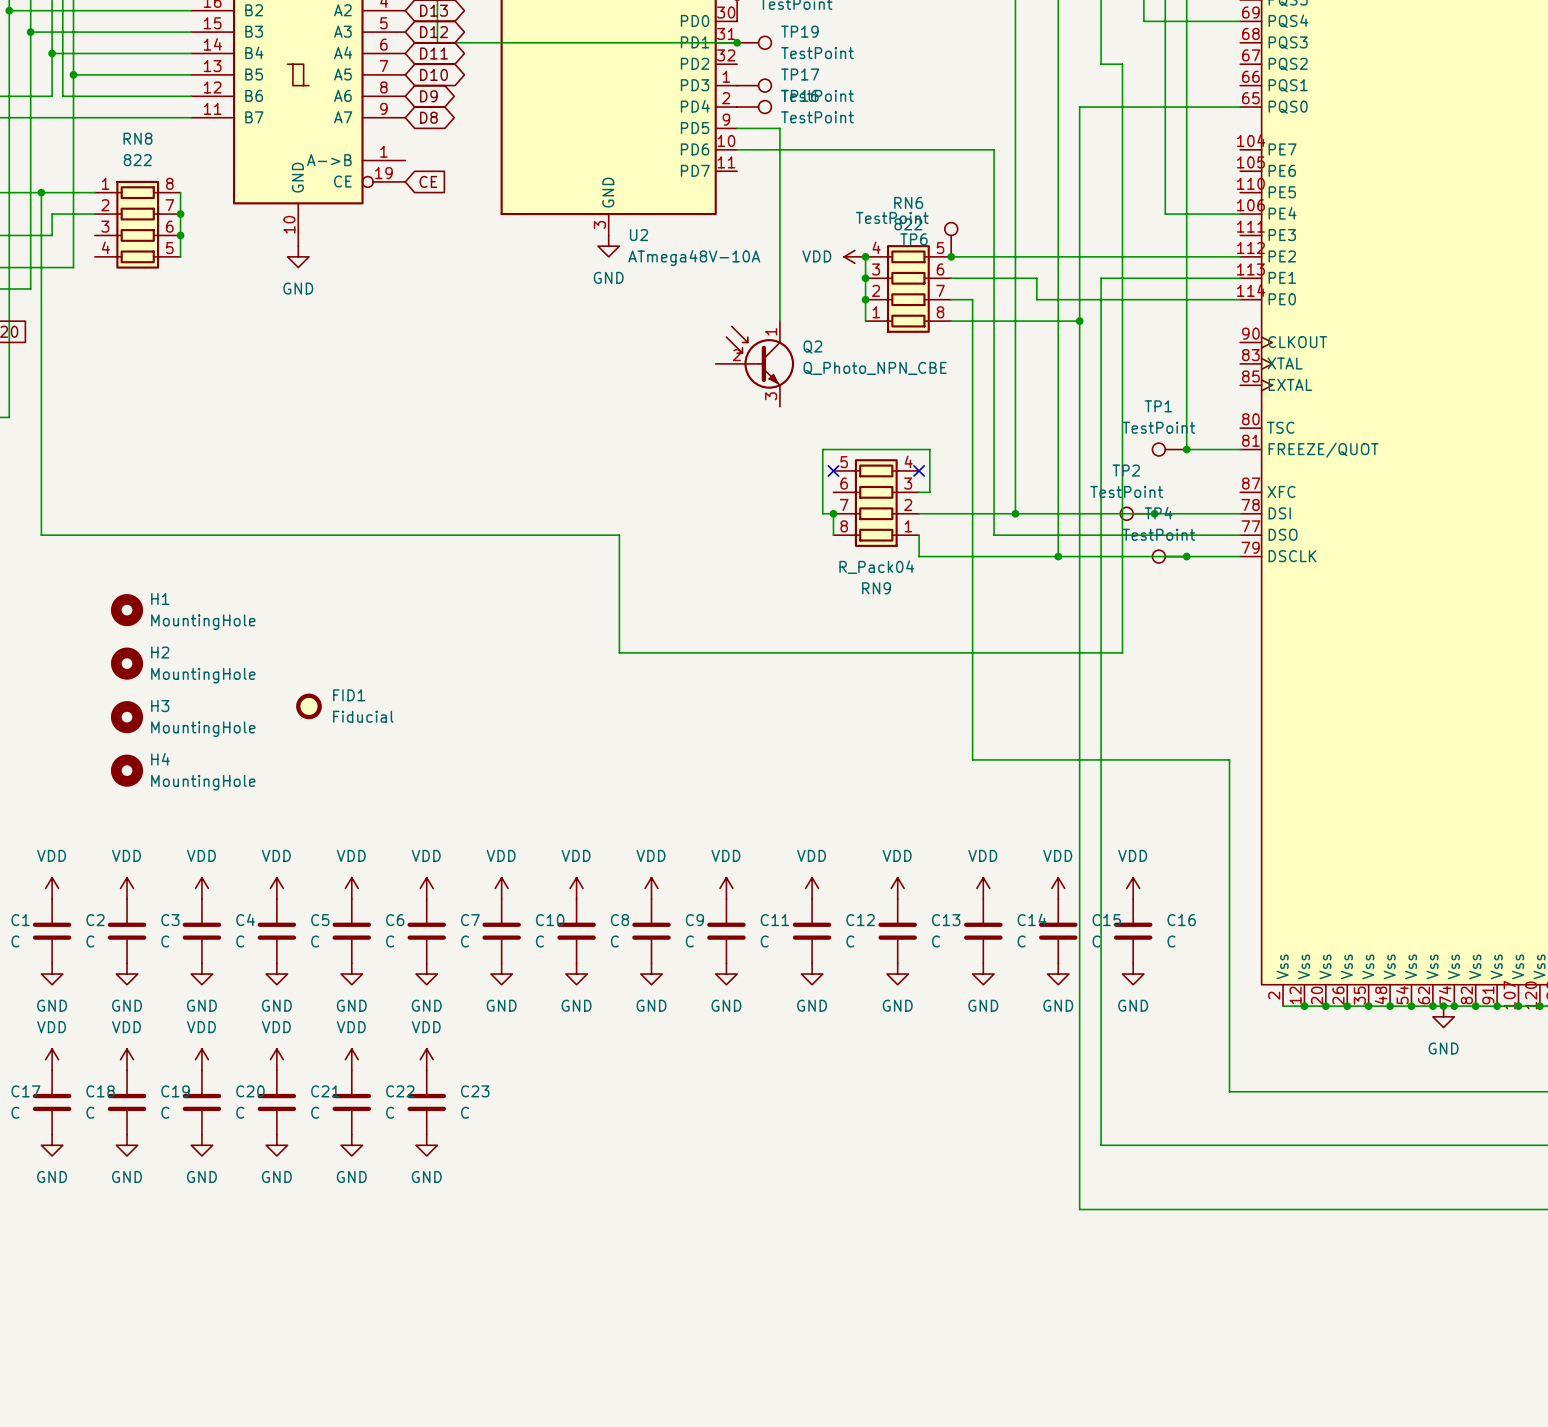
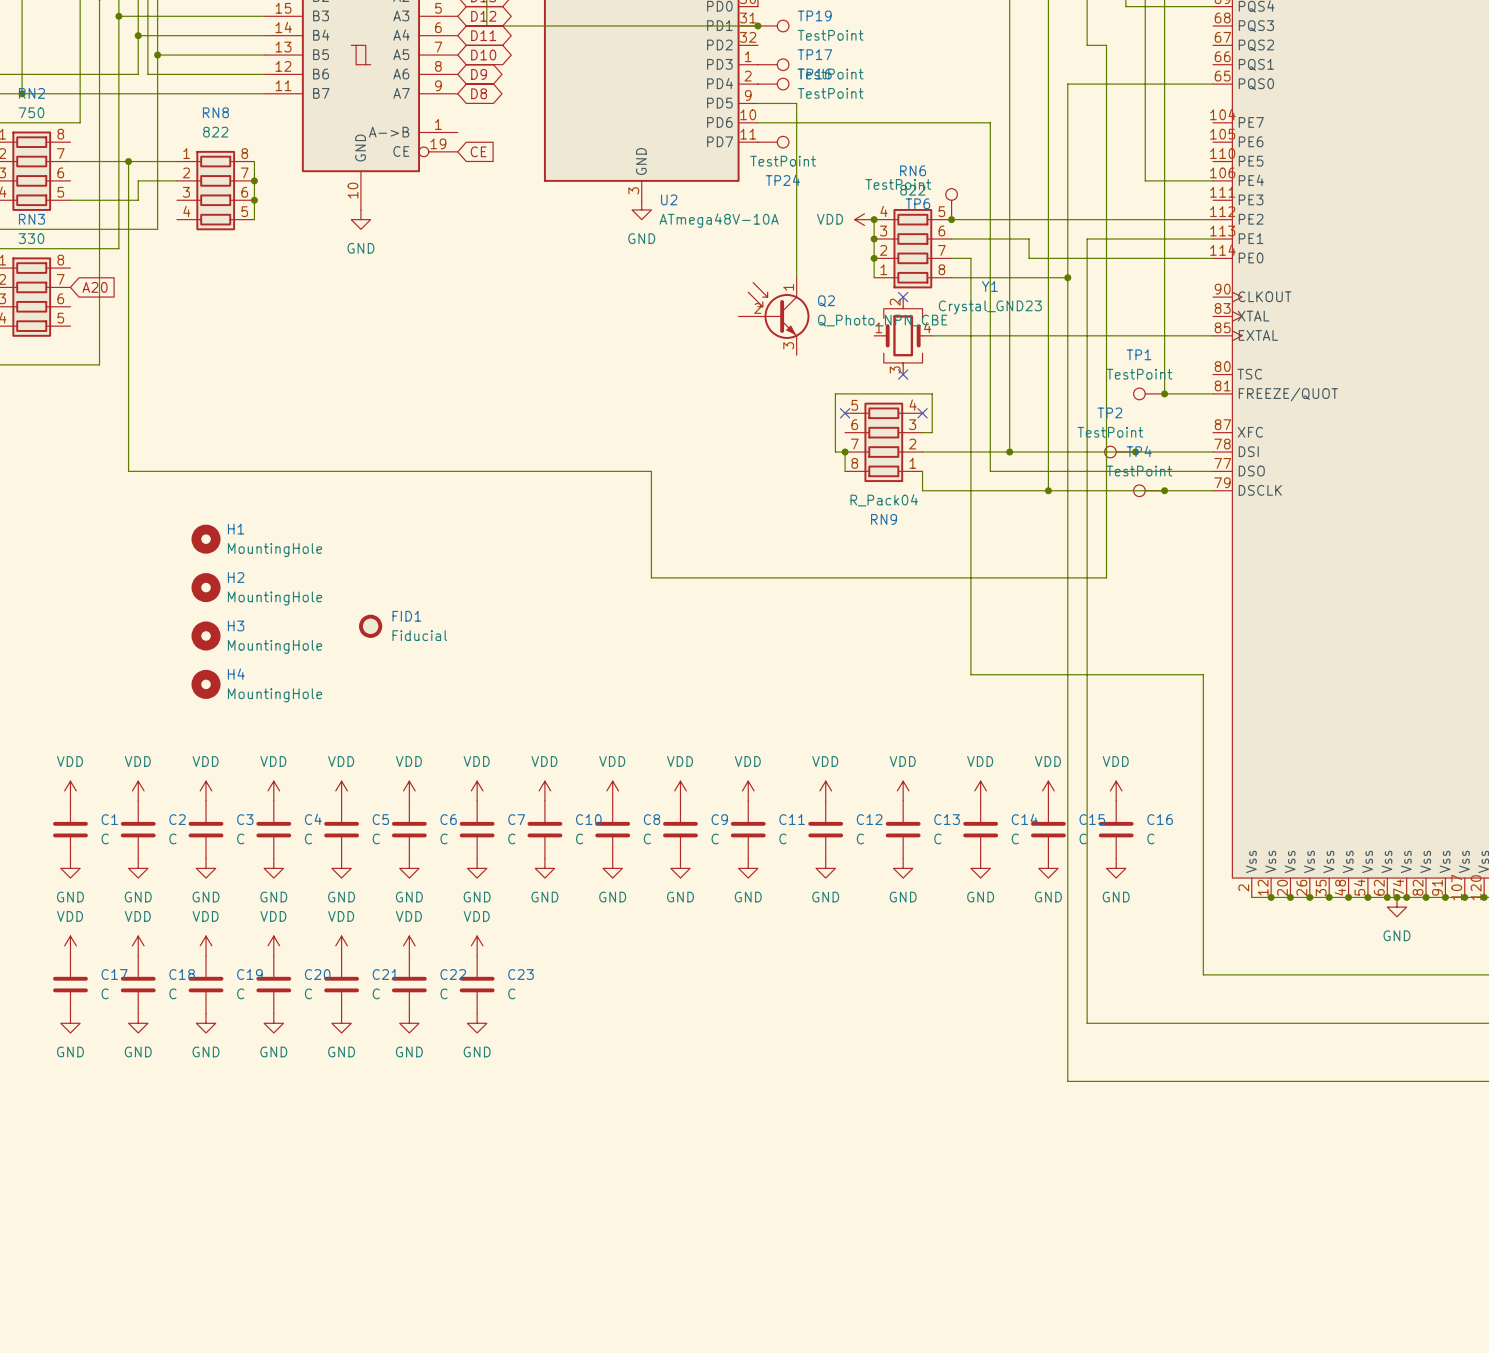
TP24: none -> TestPoint (773, 142)
no-connect mark: none -> (903, 297)
Y1: none -> Crystal_GND23 (903, 335)
wire: none -> (932, 335) (1213, 335)
no-connect mark: none -> (903, 374)

